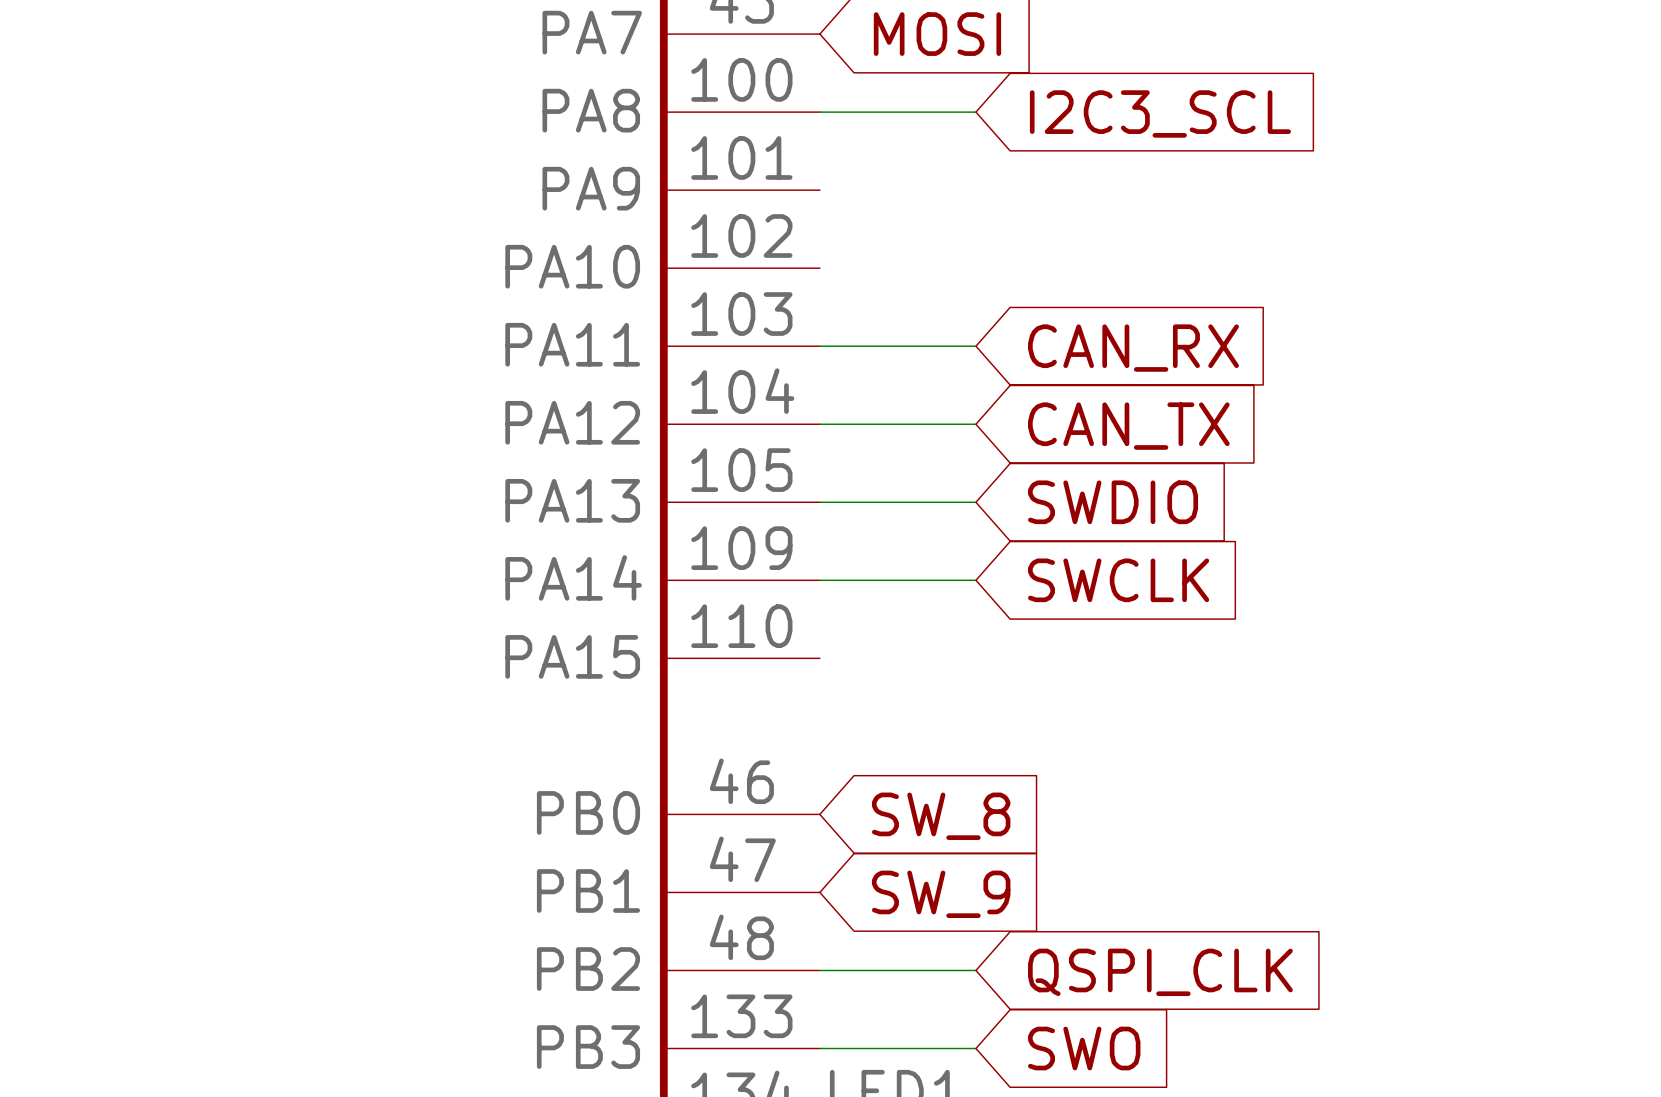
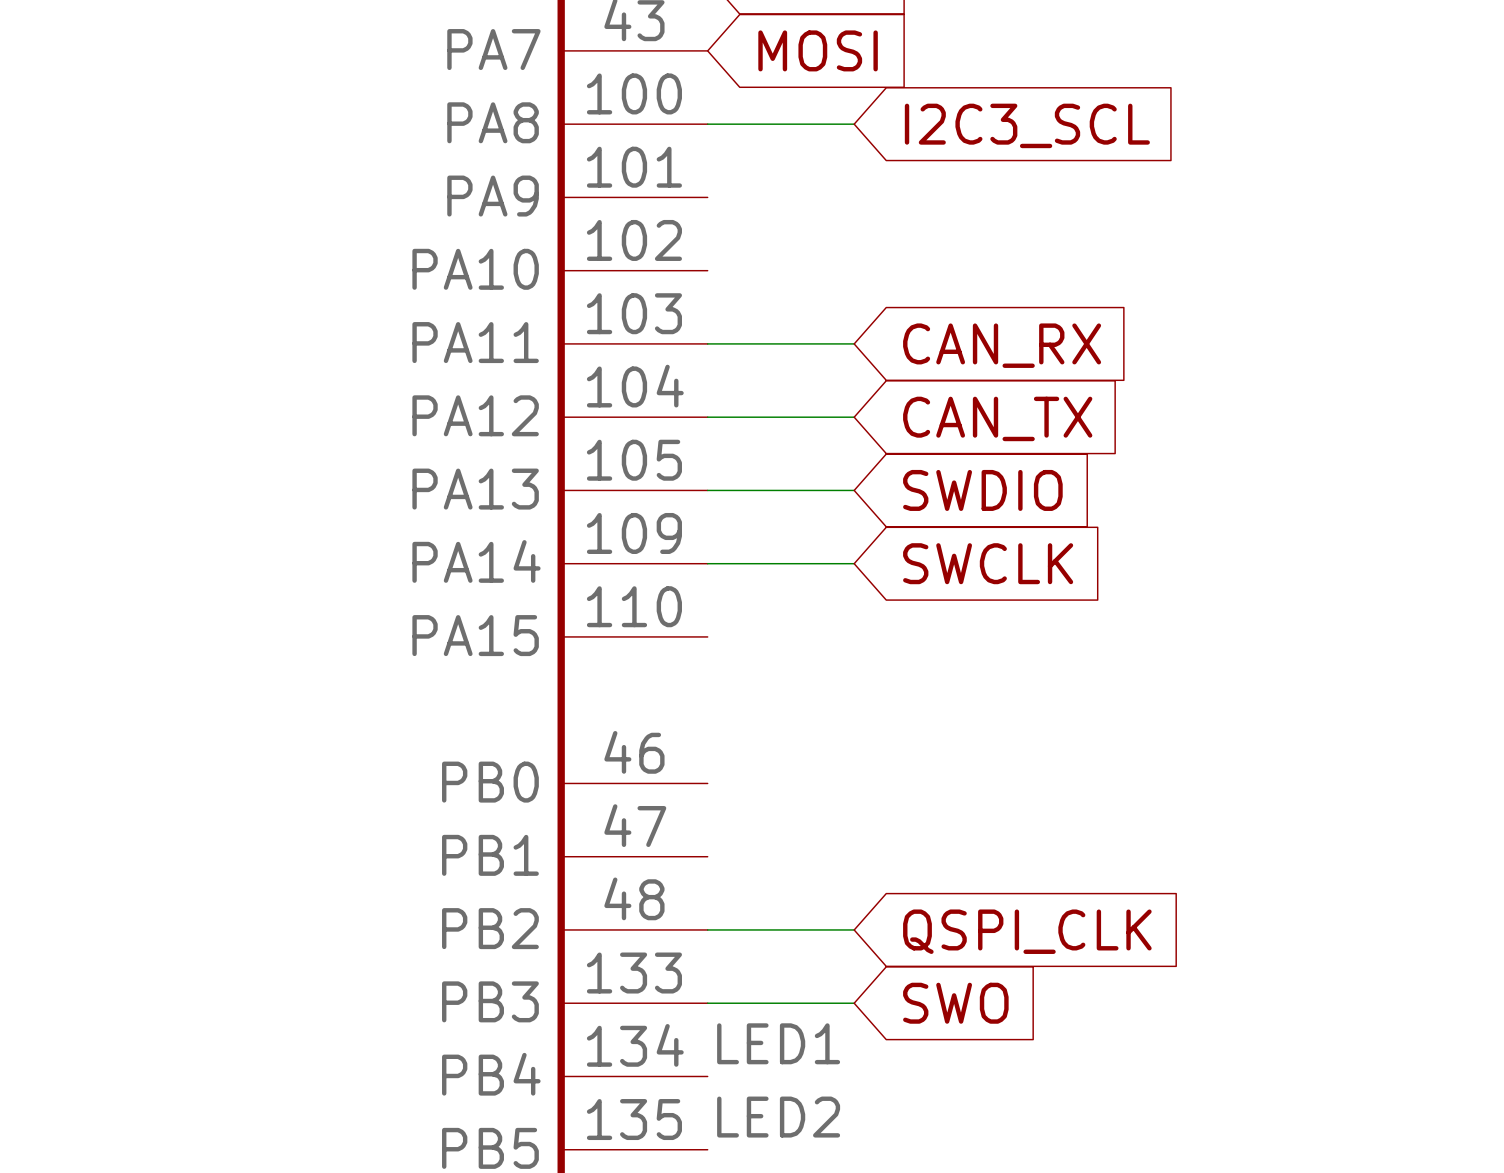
global label: SW_8 (941, 816) -> none
global label: SW_9 (941, 894) -> none

